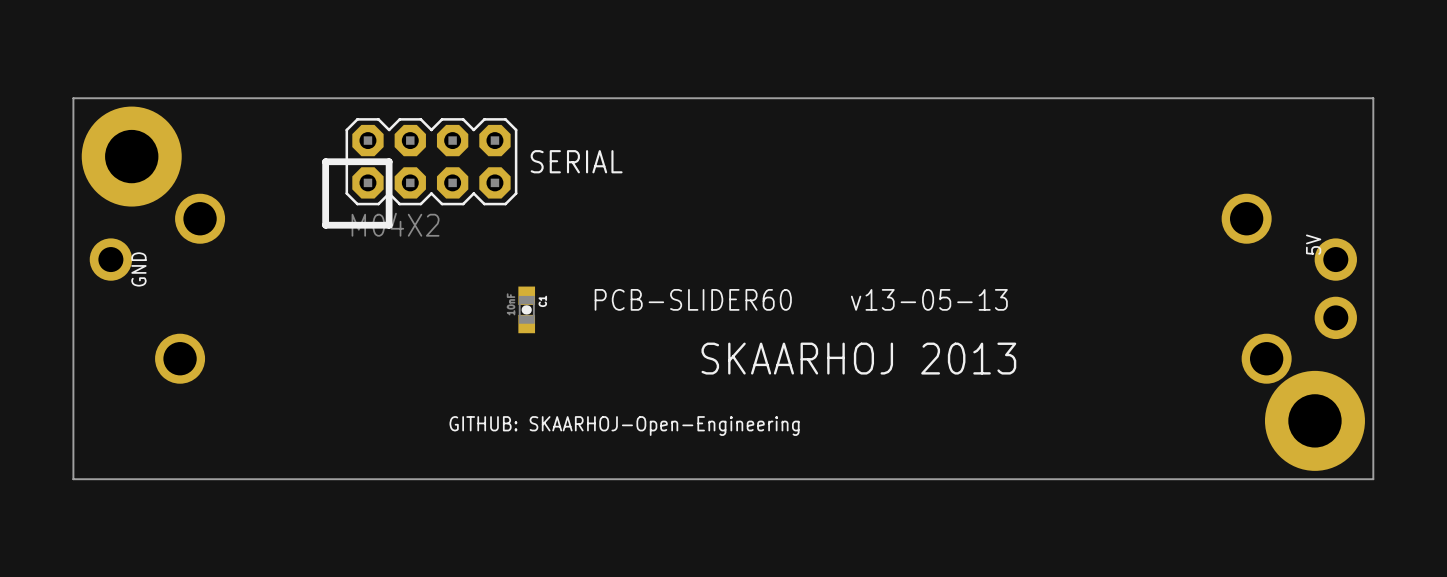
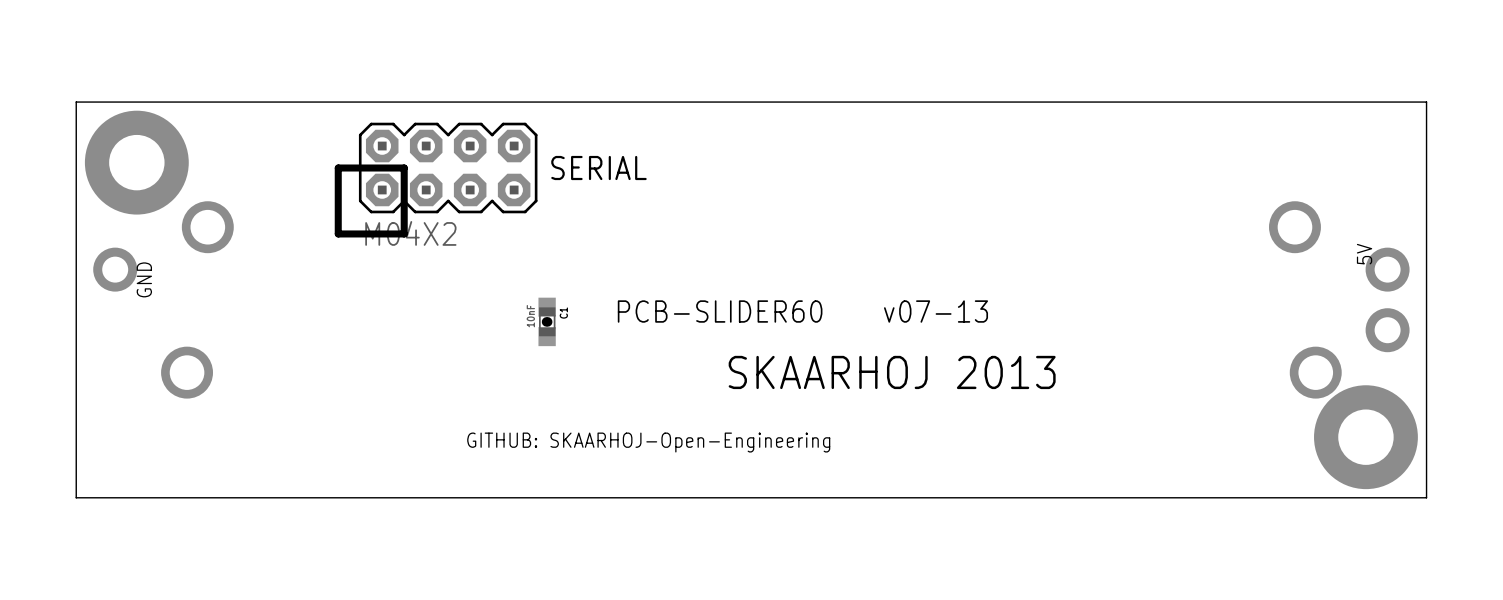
text: PCB-SLIDER60 v13-05-13 (801, 299) -> PCB-SLIDER60 v07-13 (802, 311)

